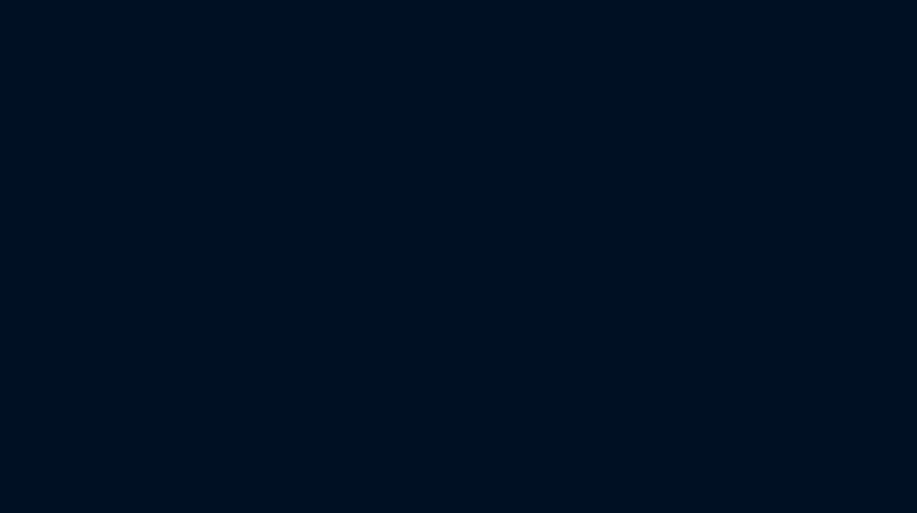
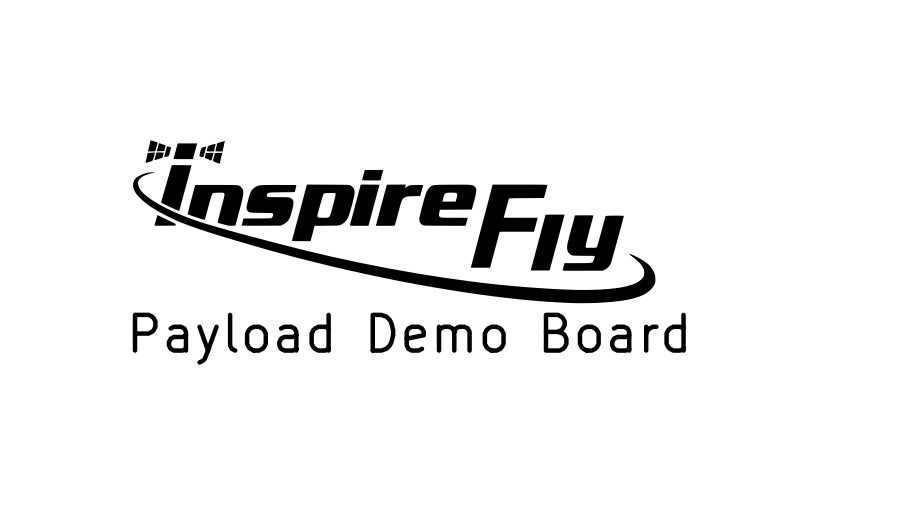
drawing: none -> [133, 140, 656, 304]
text: none -> Payload Demo Board (409, 338)

